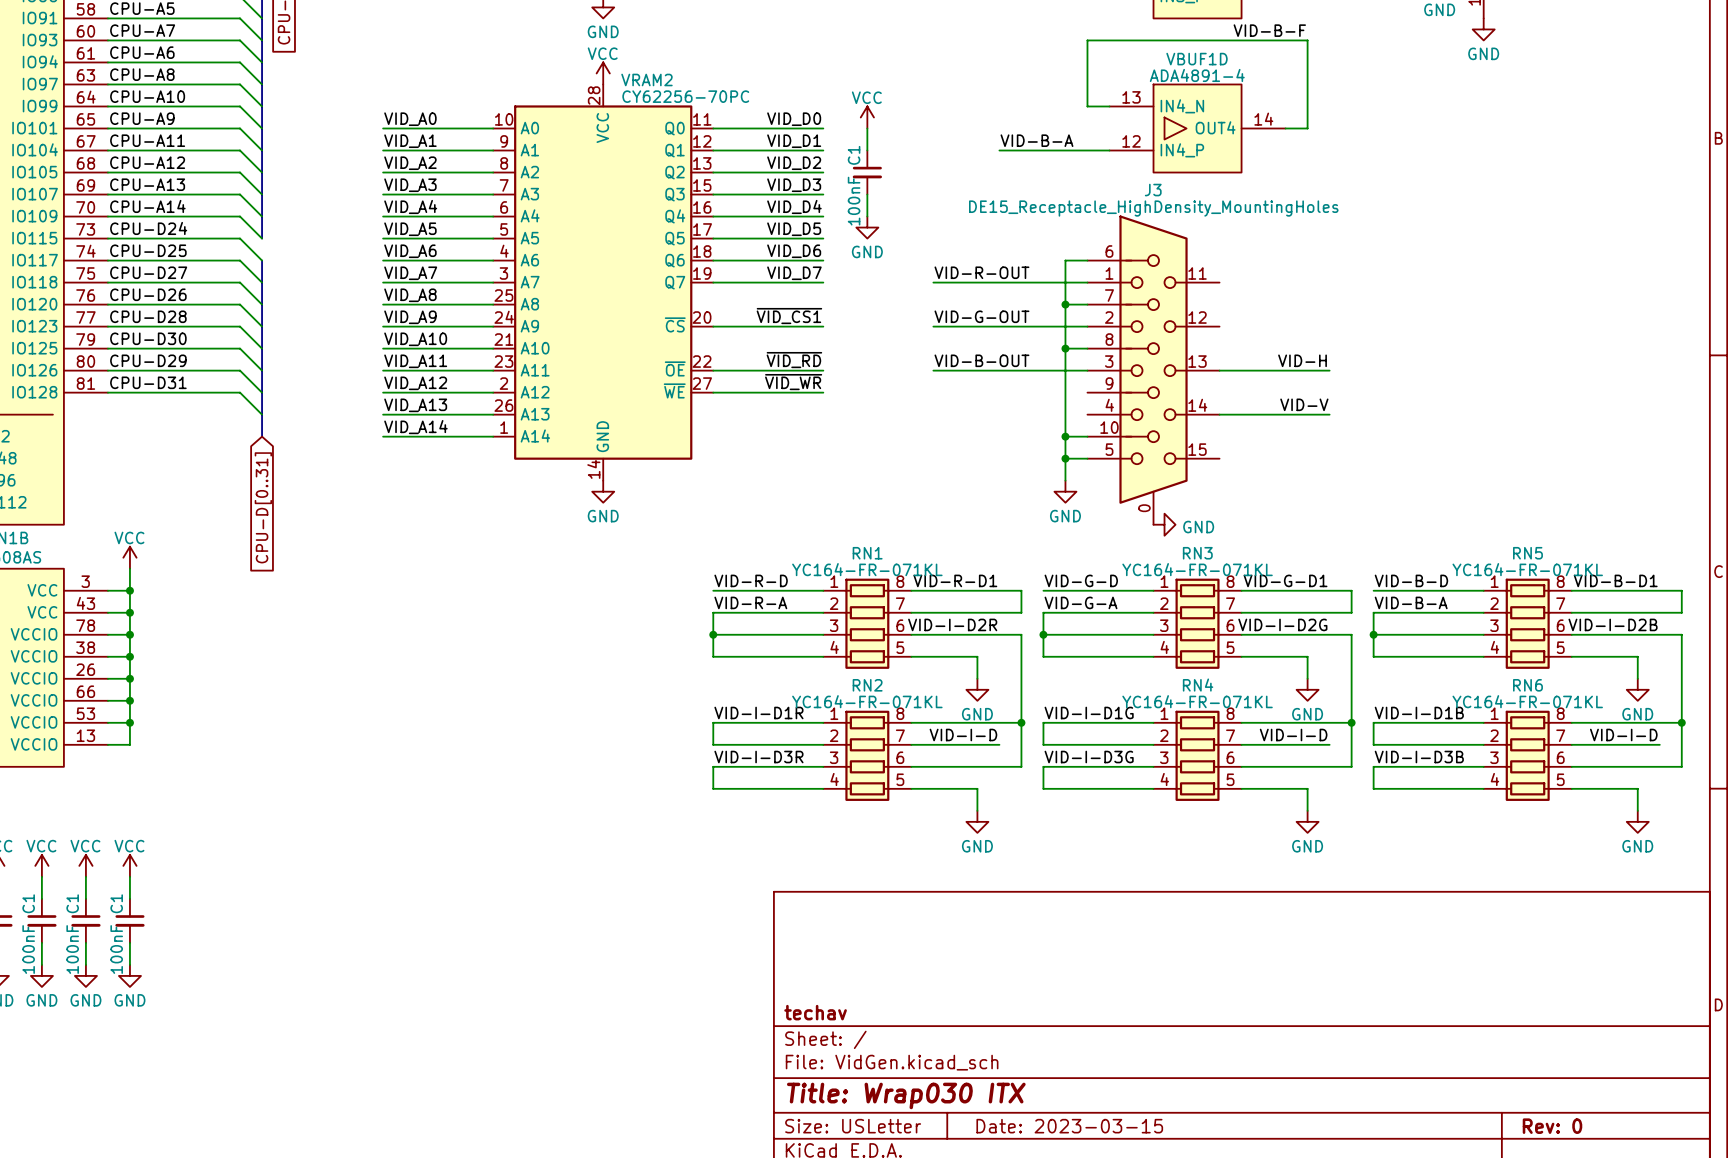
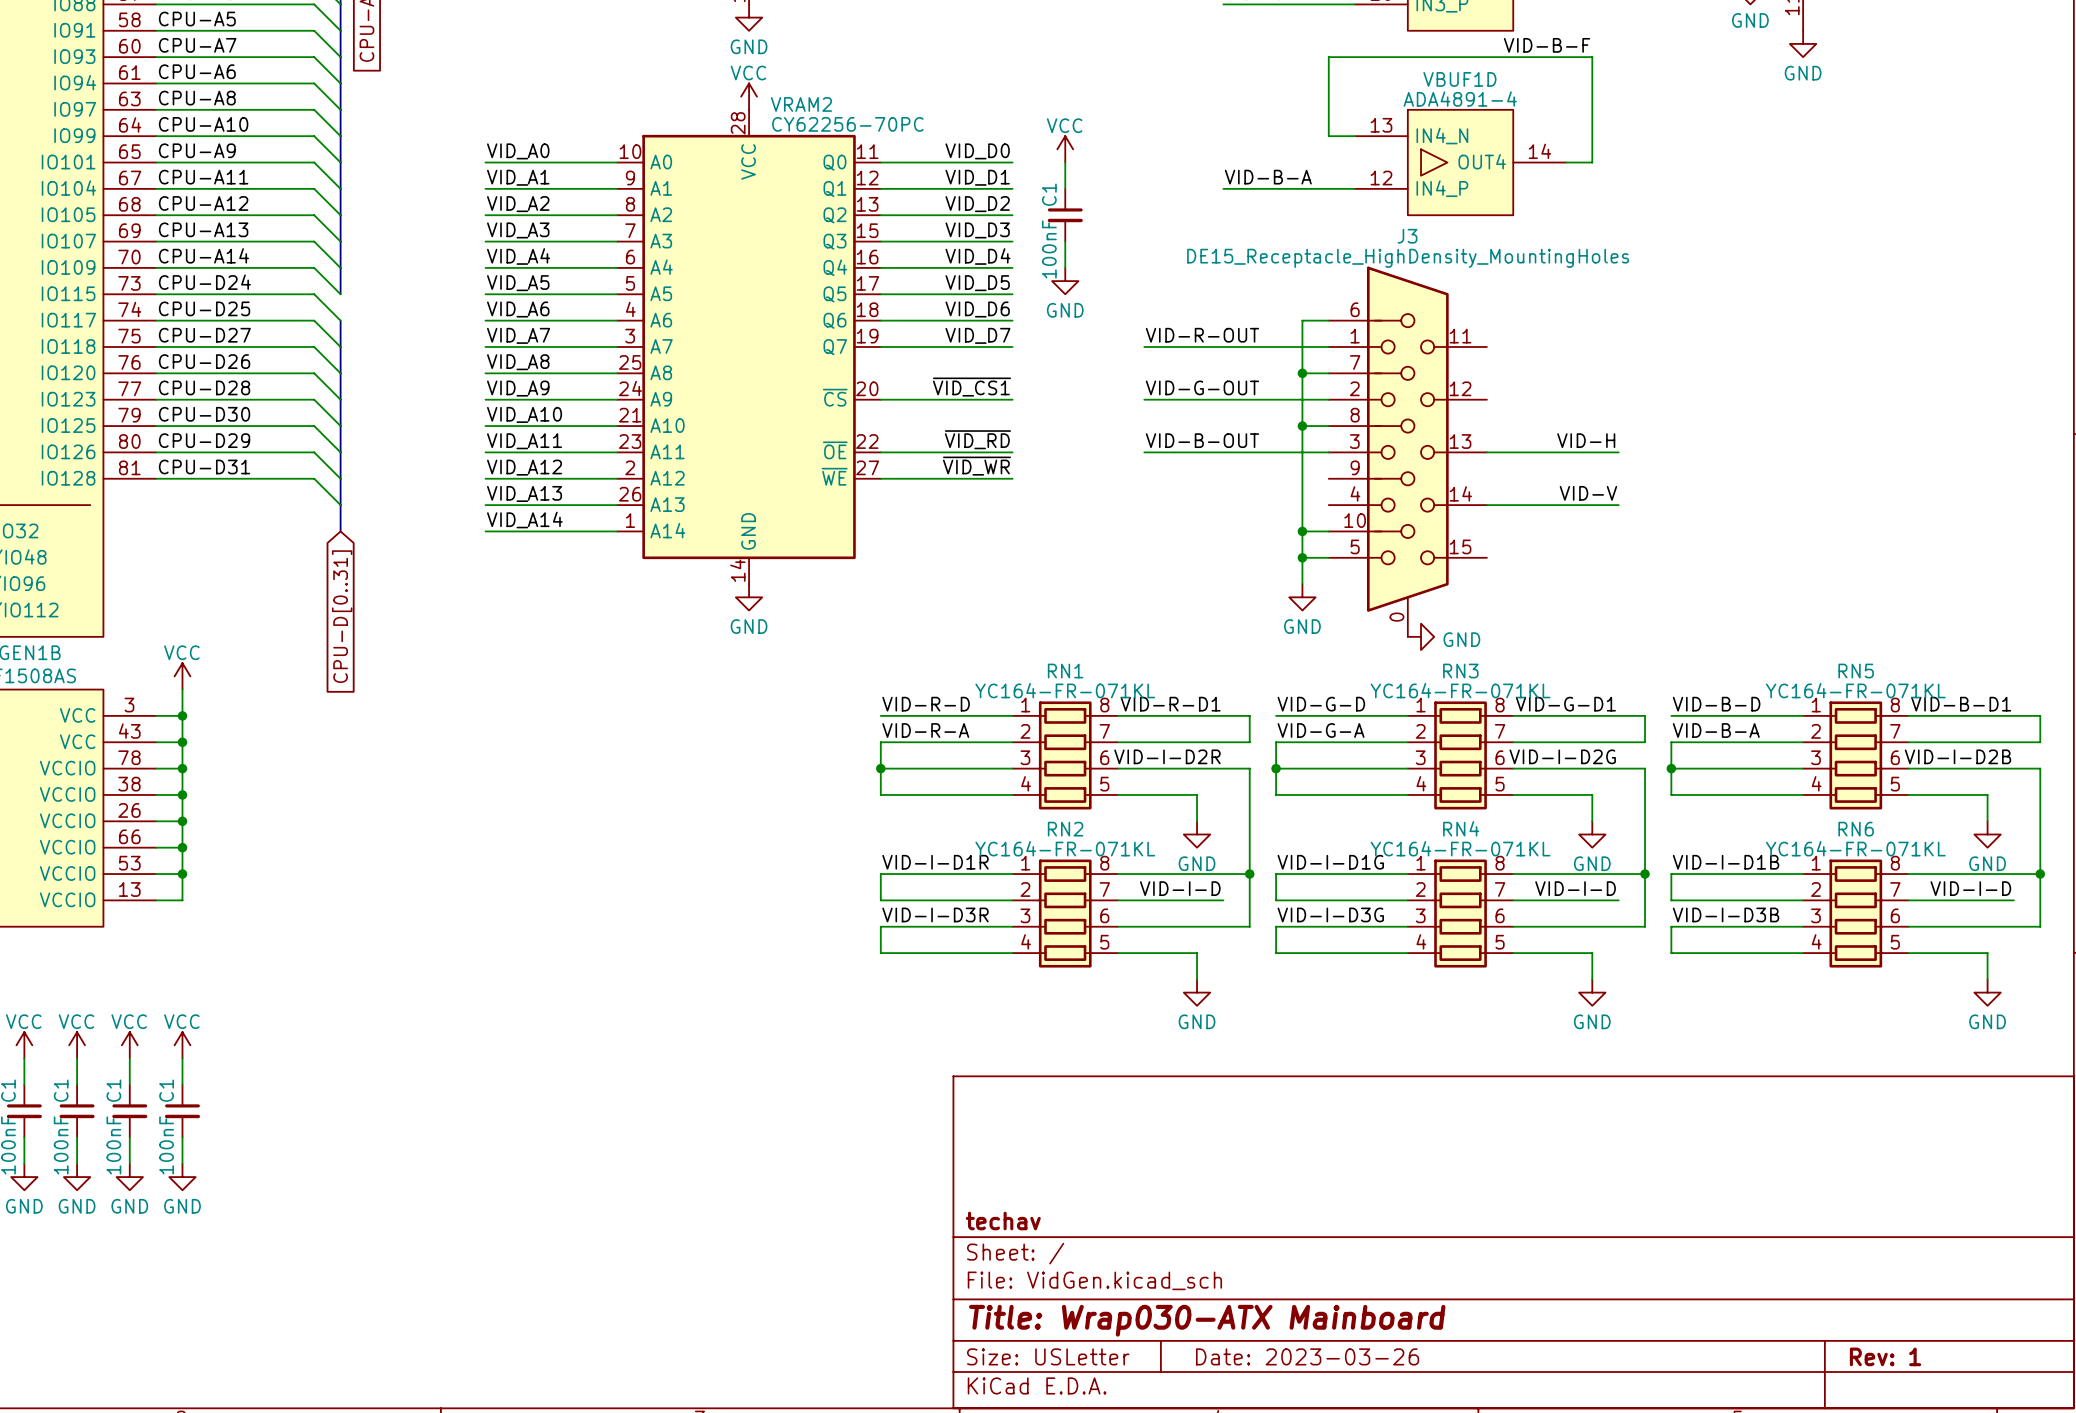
title block: Title: Wrap030 ITX (906, 1095) -> Title: Wrap030-ATX Mainboard (1207, 1320)
title block: Date: 2023-03-15 (1069, 1126) -> Date: 2023-03-26 (1307, 1356)
title block: Rev: 0 (1552, 1126) -> Rev: 1 (1885, 1356)

